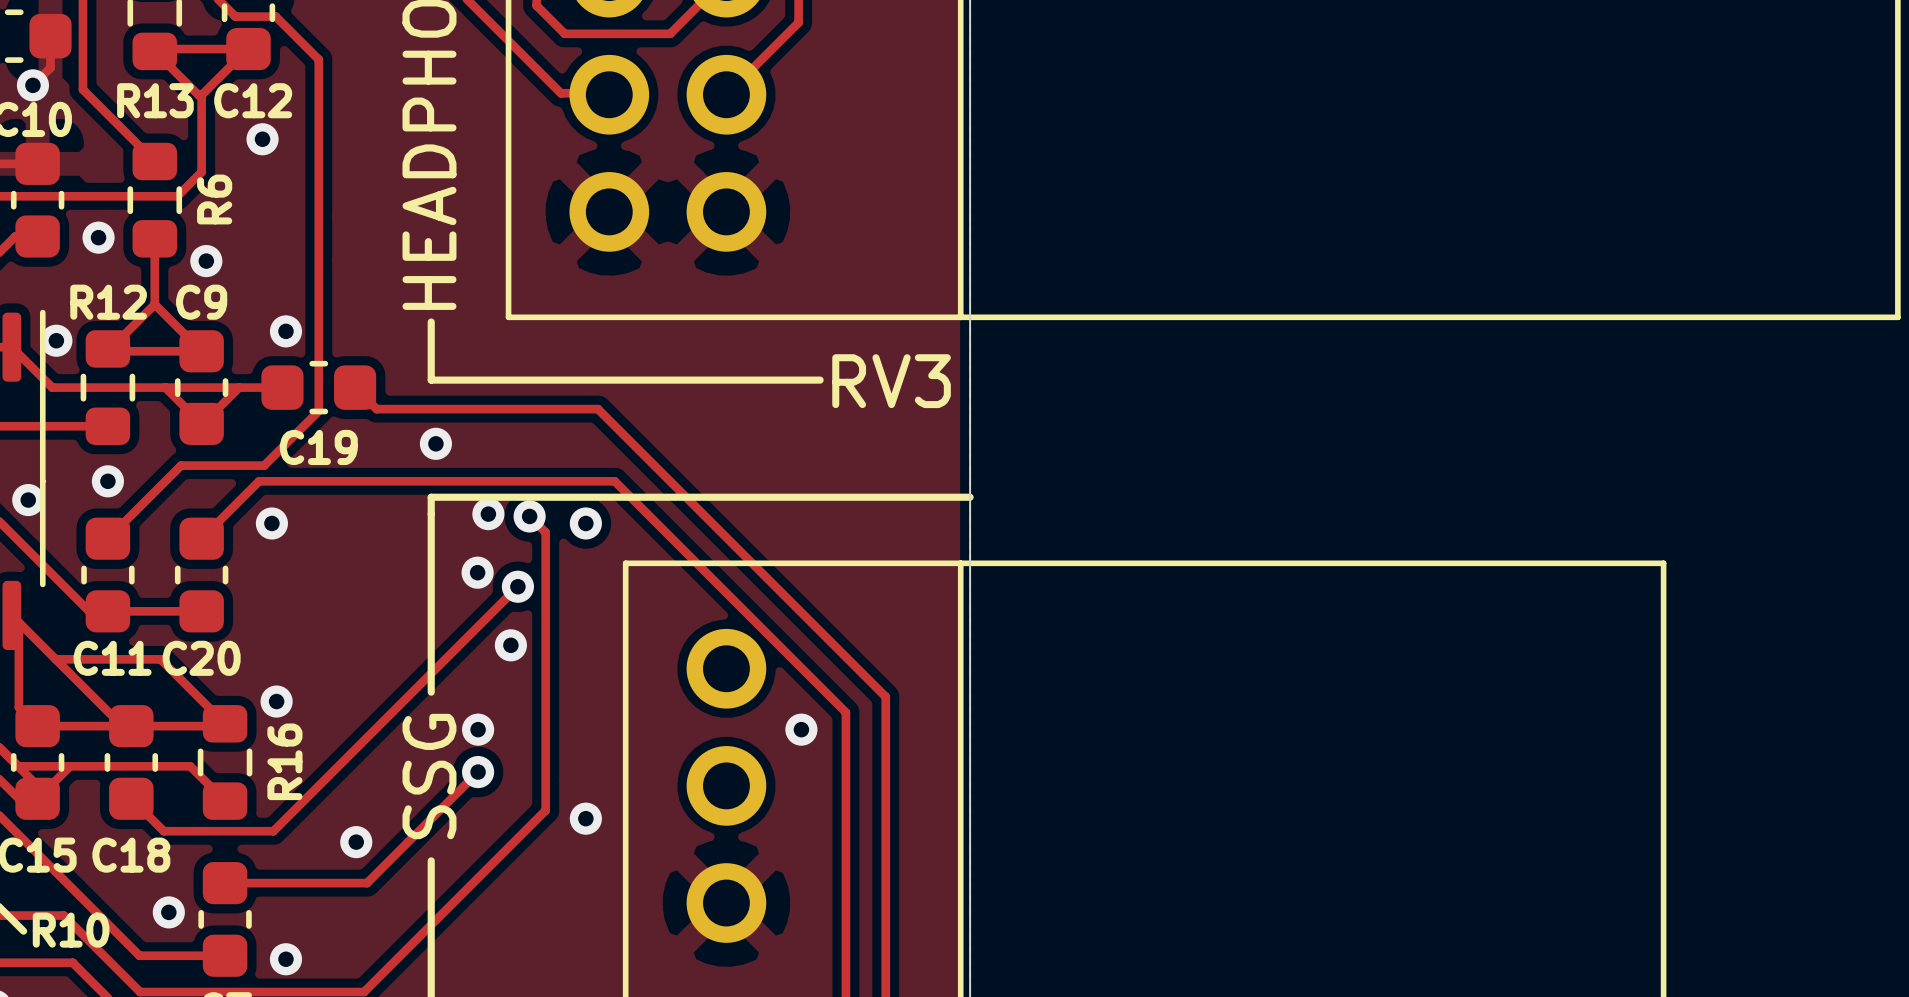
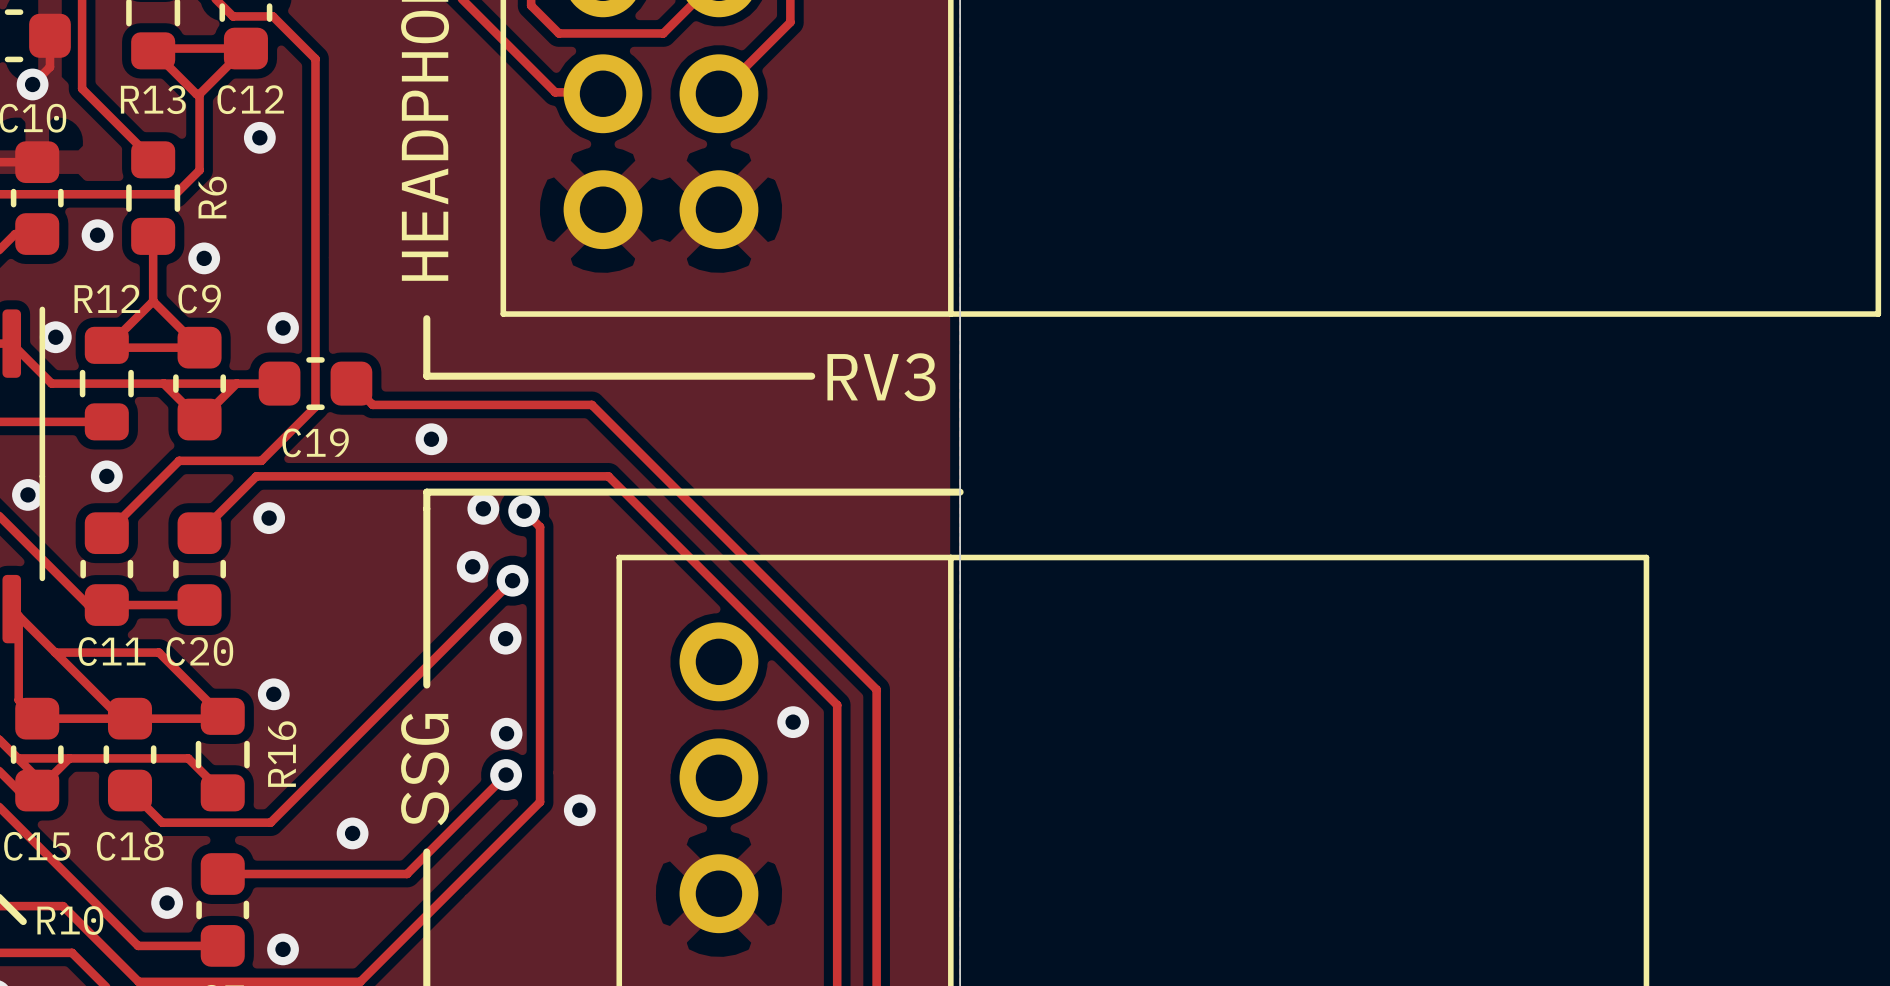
via: (585, 523) -> none
via: (478, 729) -> none
via: none -> (506, 733)
track: (478, 772) (367, 883) -> (506, 775) (407, 874) (363, 874)
via: (478, 772) -> none
via: none -> (506, 775)

